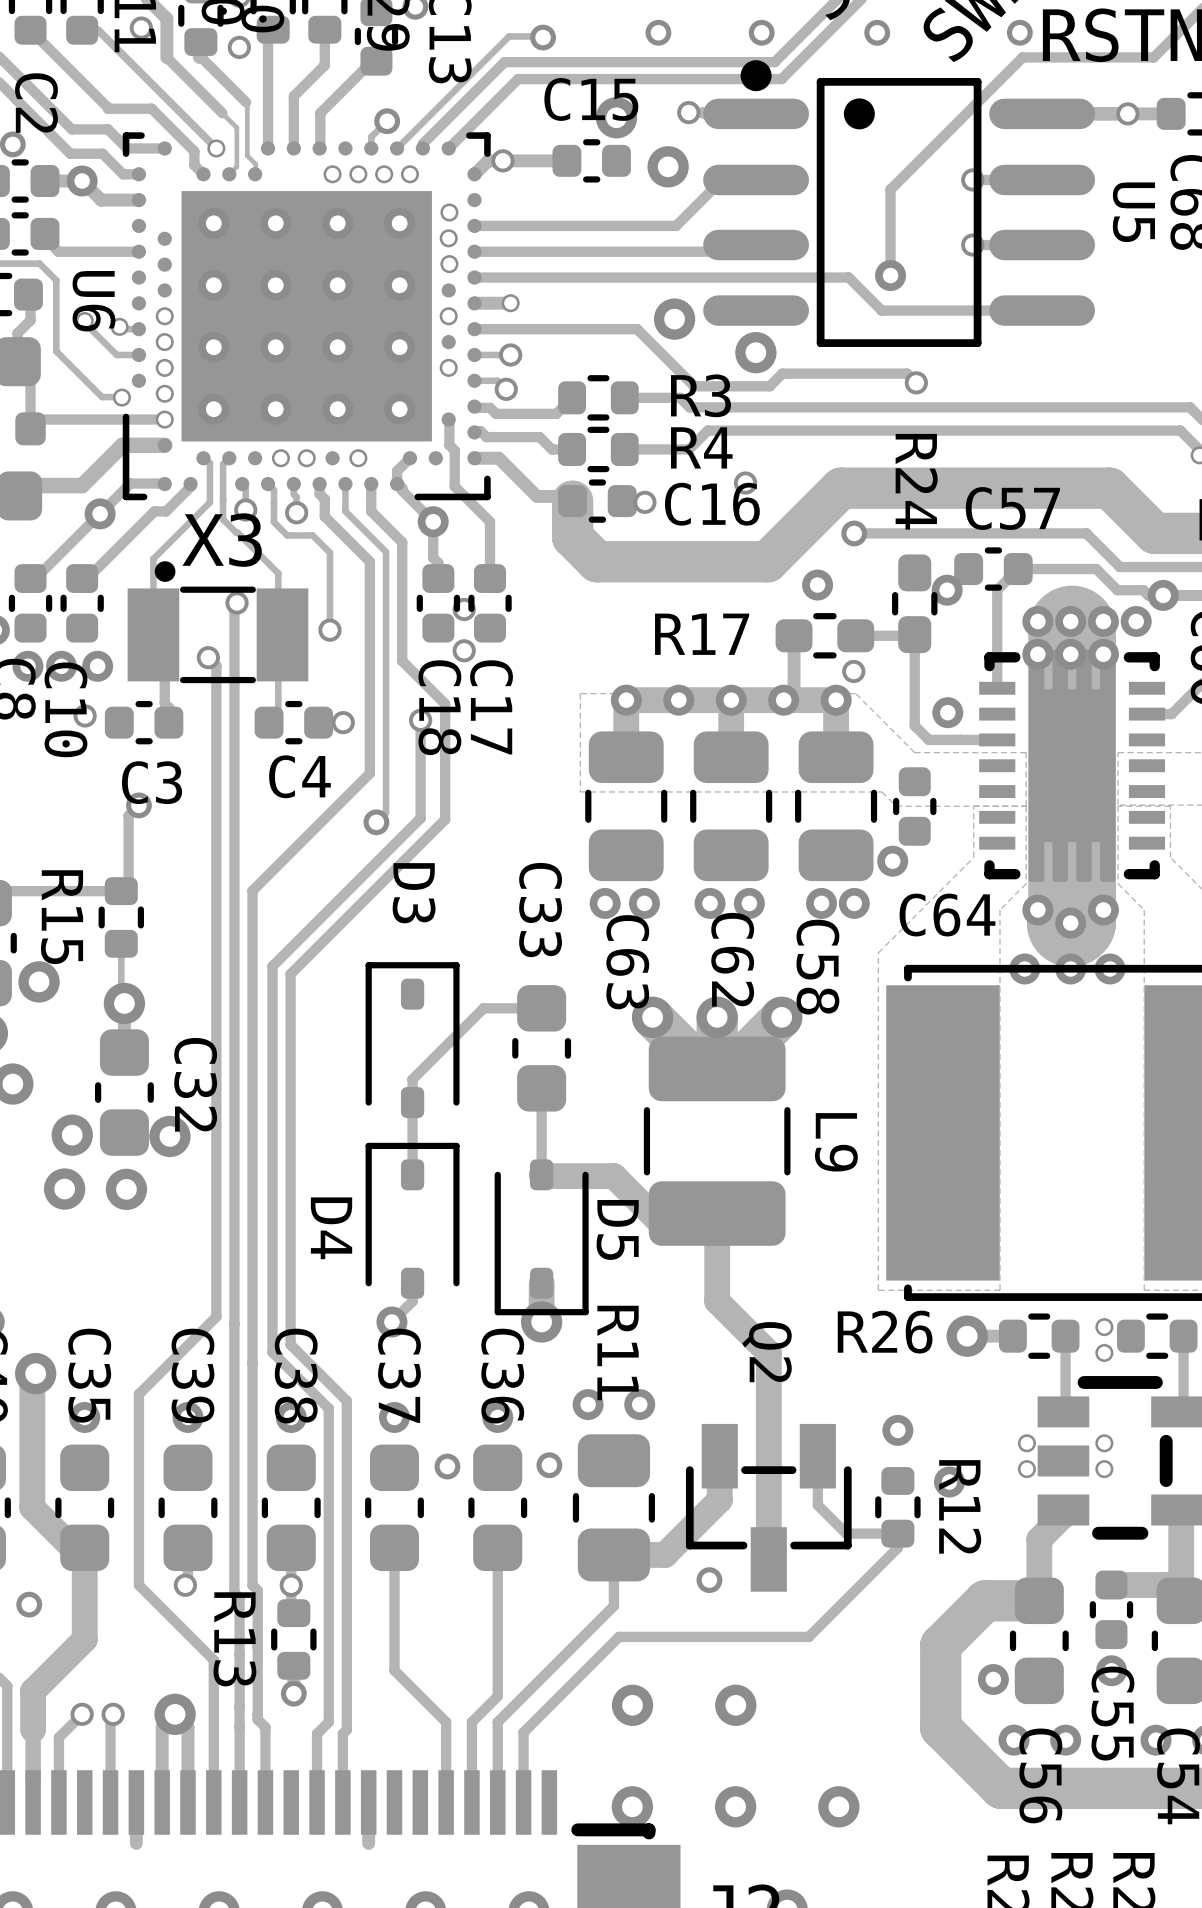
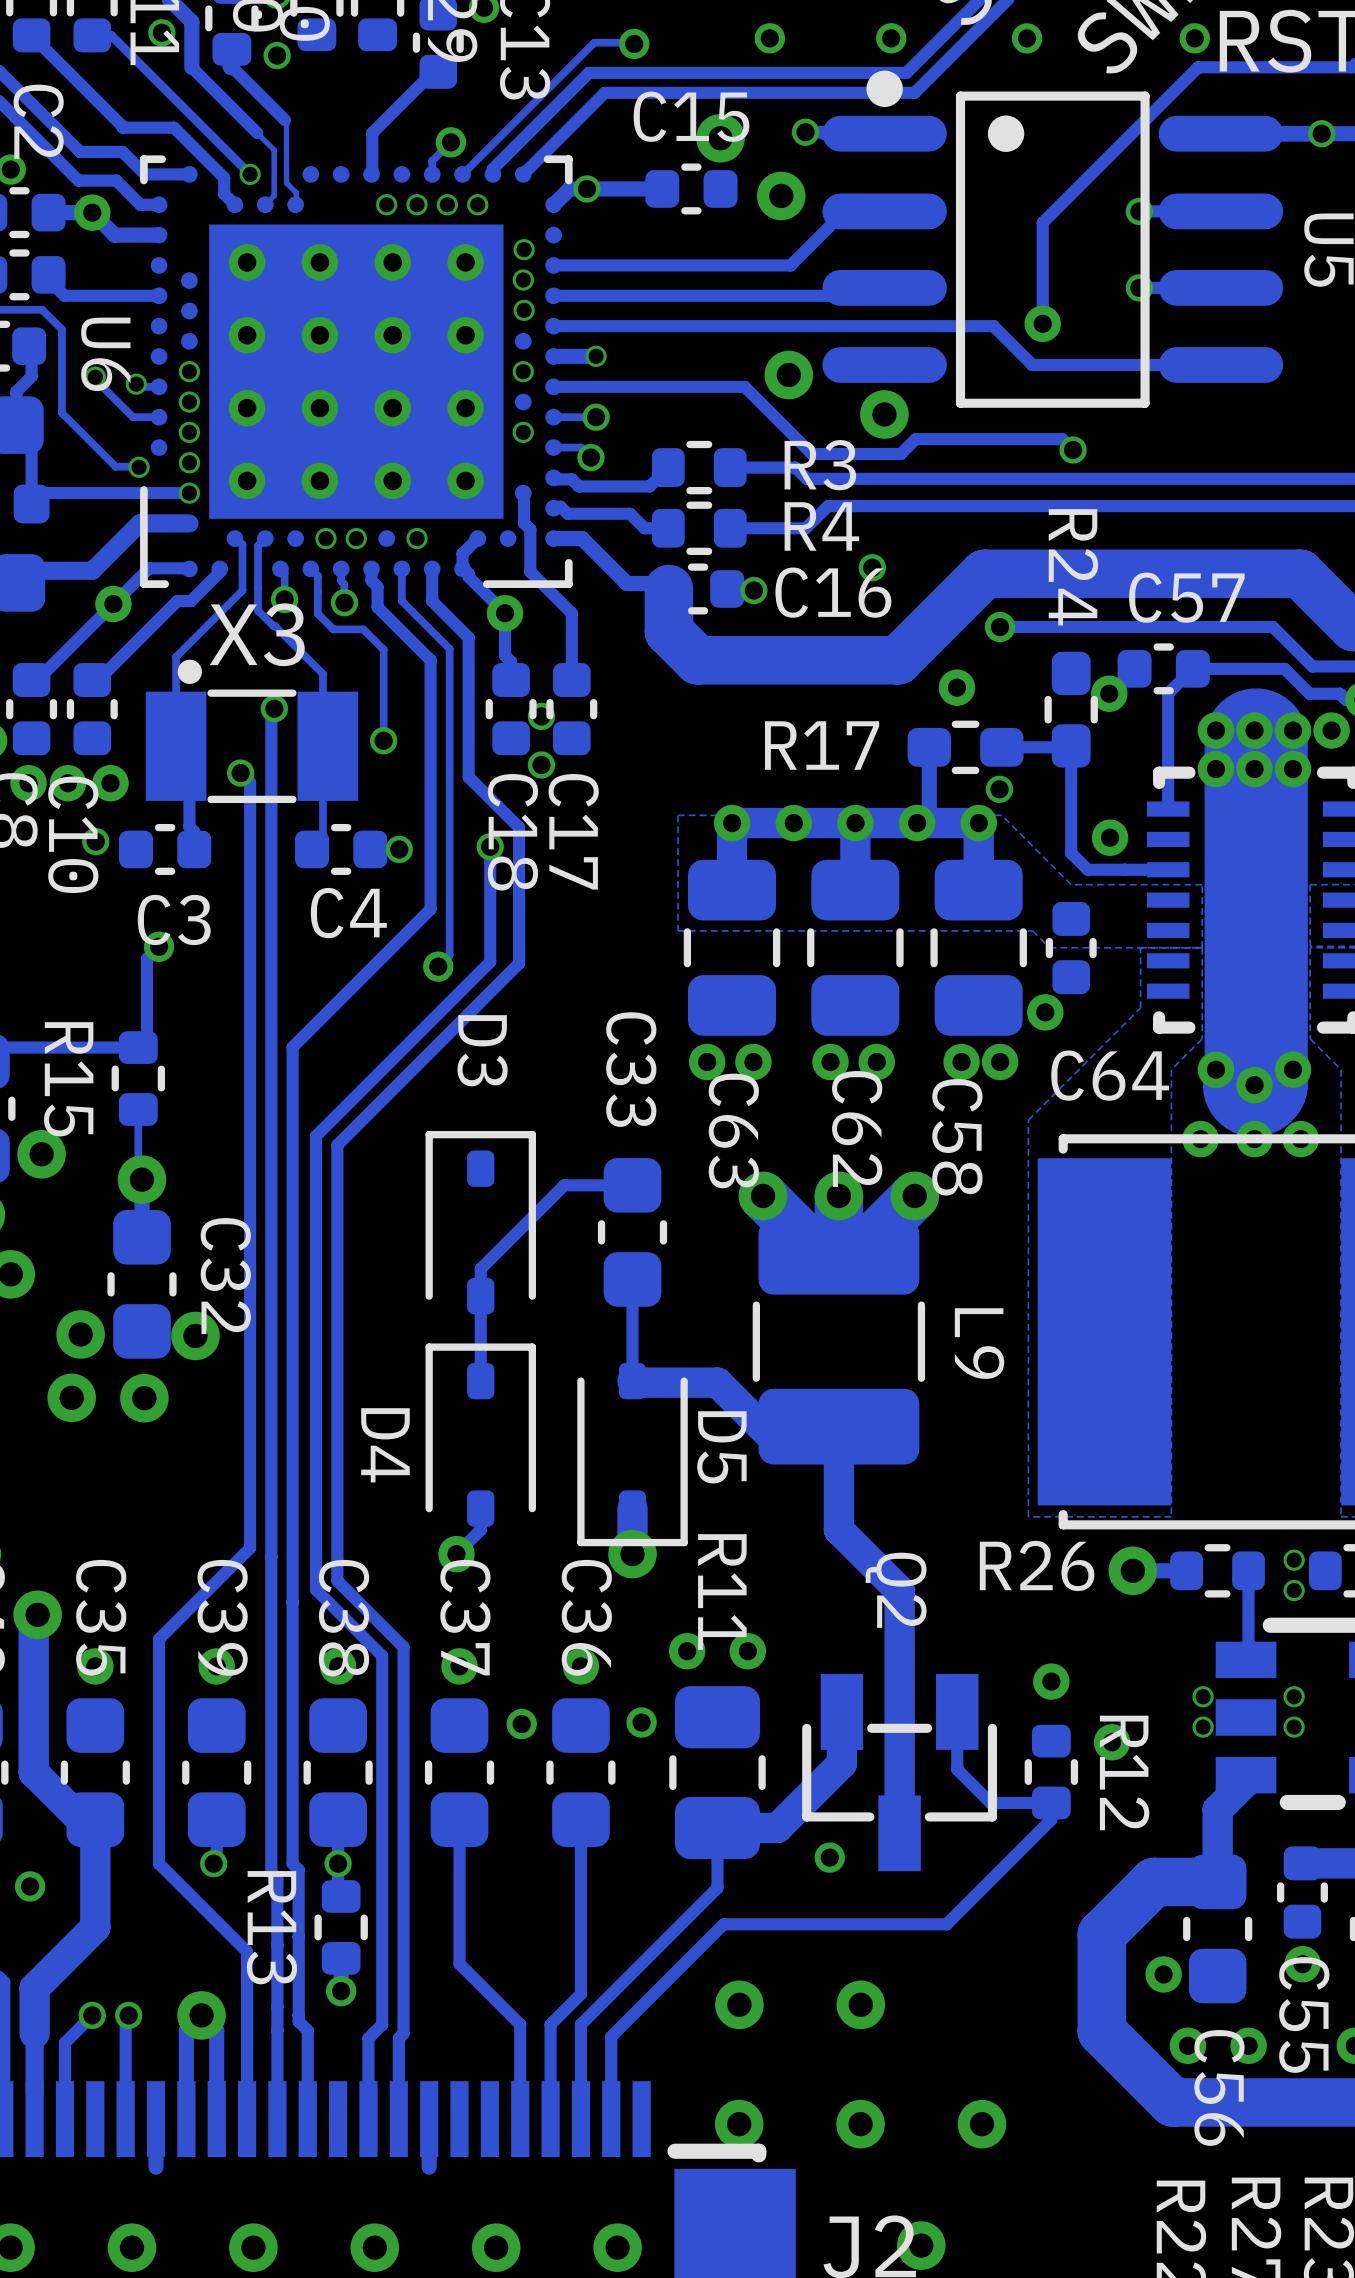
track: (273, 29) (268, 34) (268, 148) -> none
track: (324, 29) (324, 65) (293, 96) (293, 148) -> none

